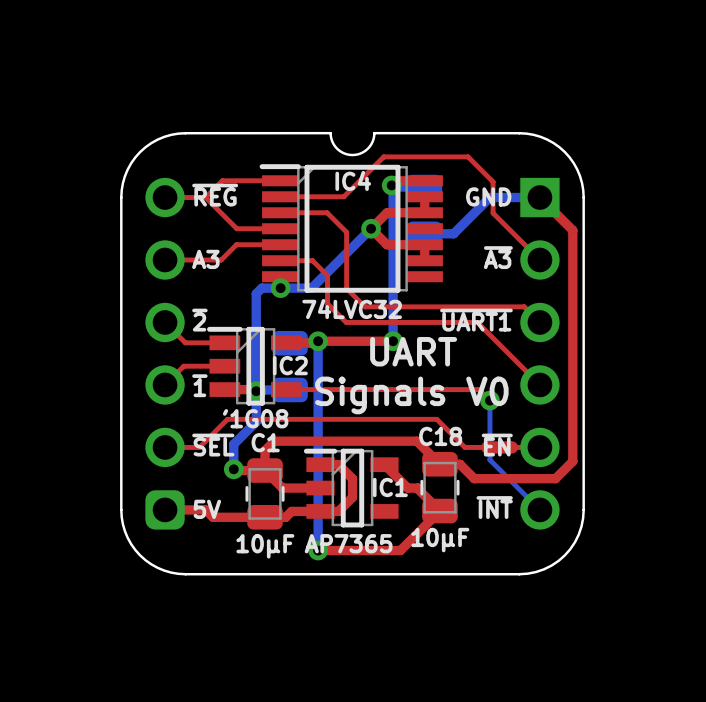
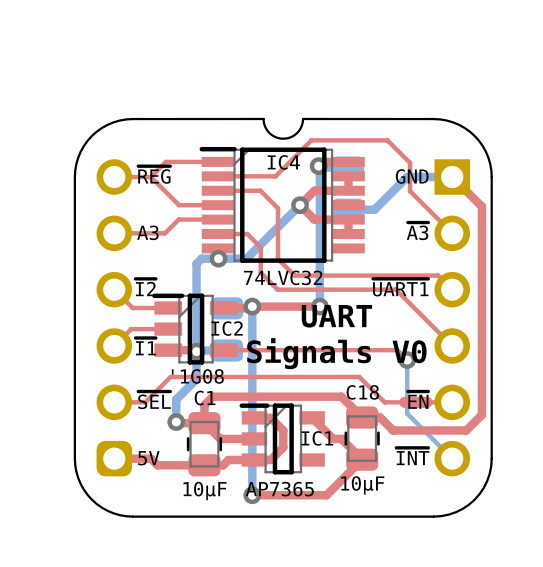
text: ~{2} (199, 320) -> ~{I2} (145, 287)
text: ~{1} (199, 385) -> ~{I1} (145, 346)

